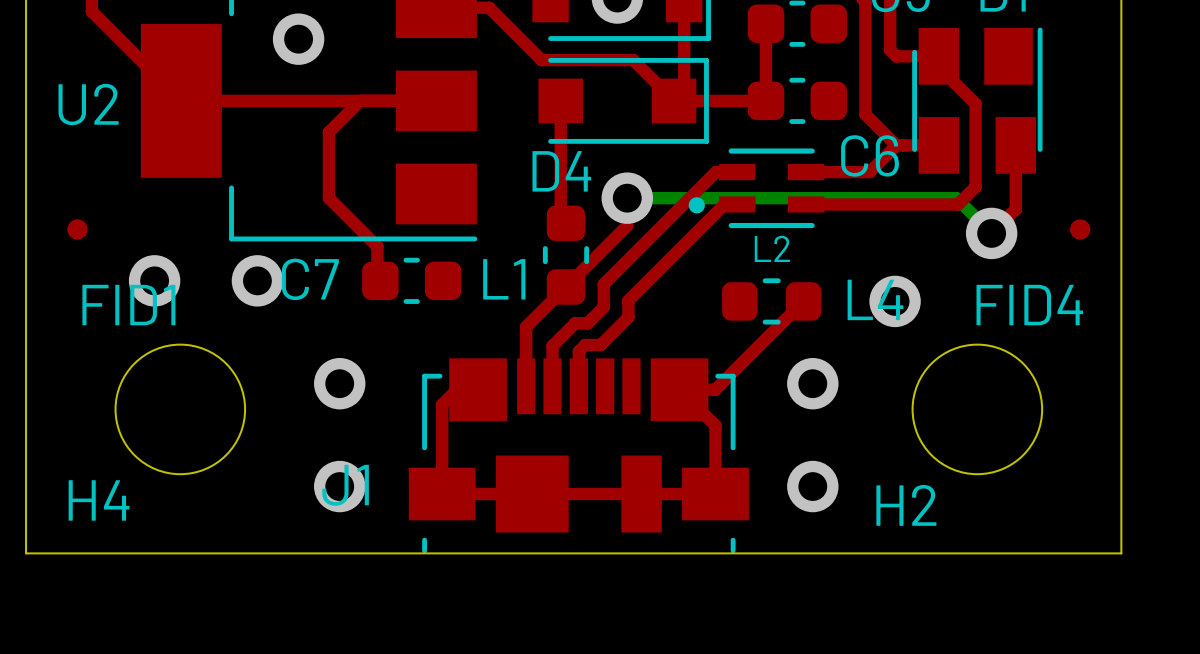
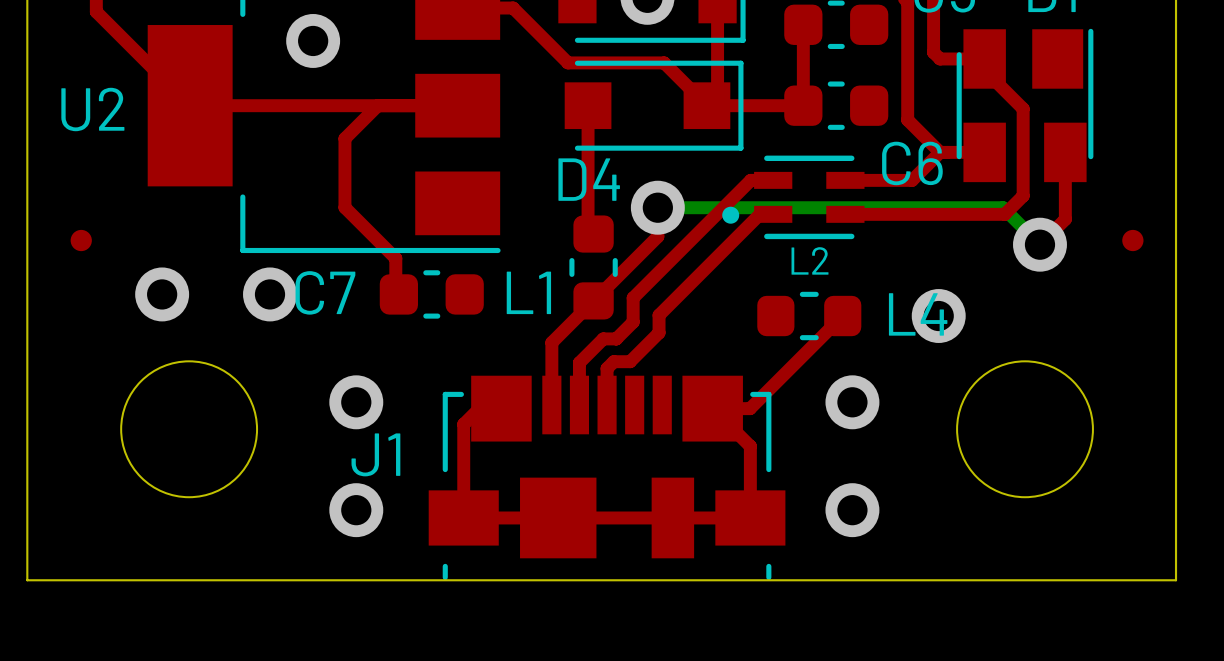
FID1 name: FID1 (128, 305) -> none
FID4 name: FID4 (1029, 305) -> none
J1 name position: J1 (345, 485) -> J1 (375, 454)
H4 name: H4 (98, 500) -> none
H2 name: H2 (906, 505) -> none

